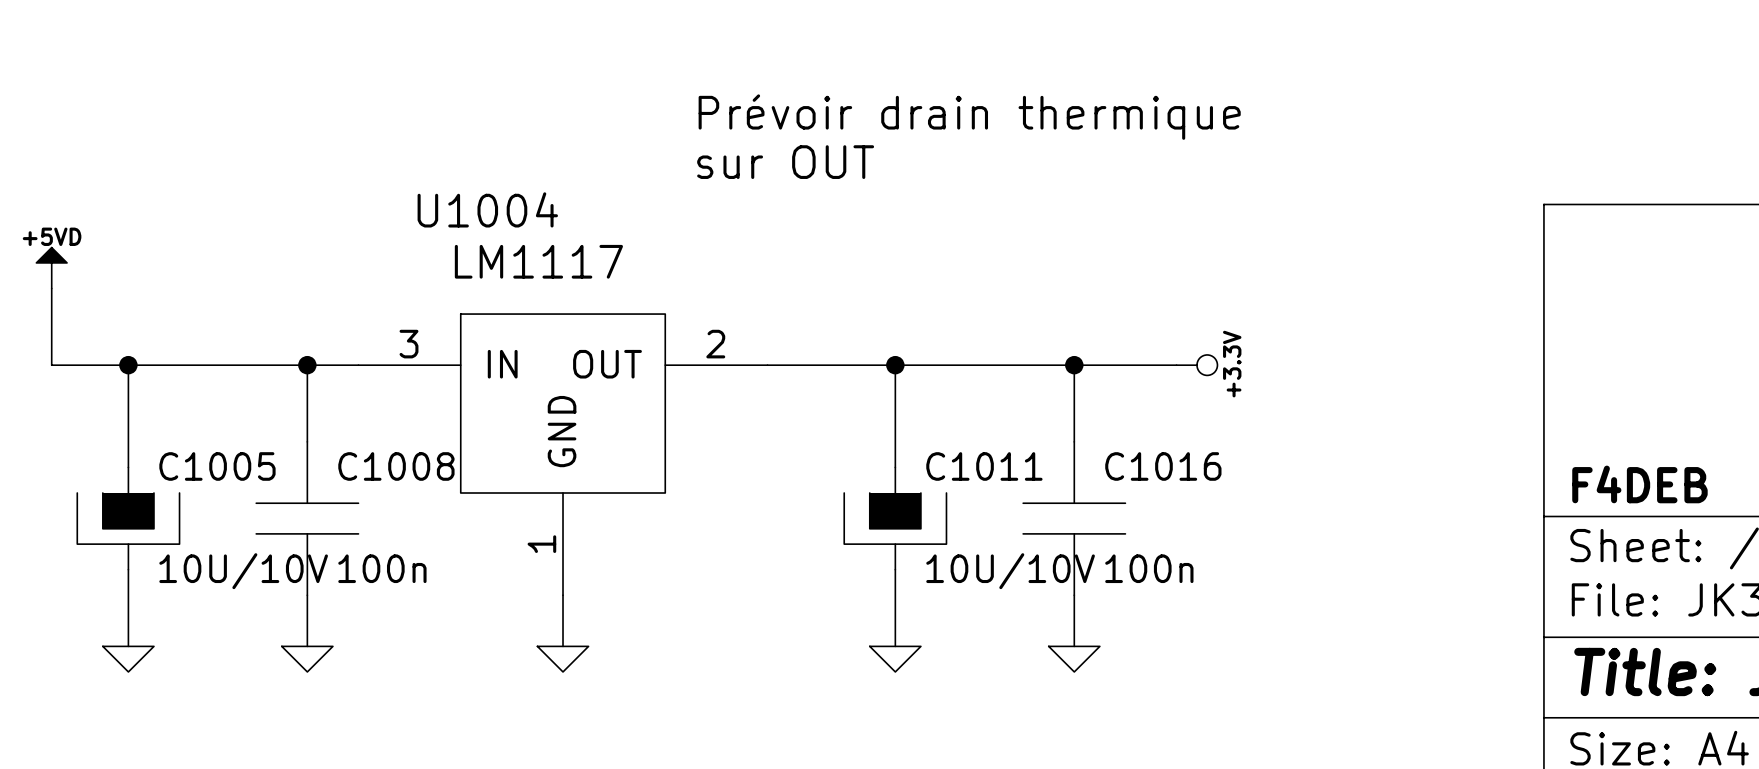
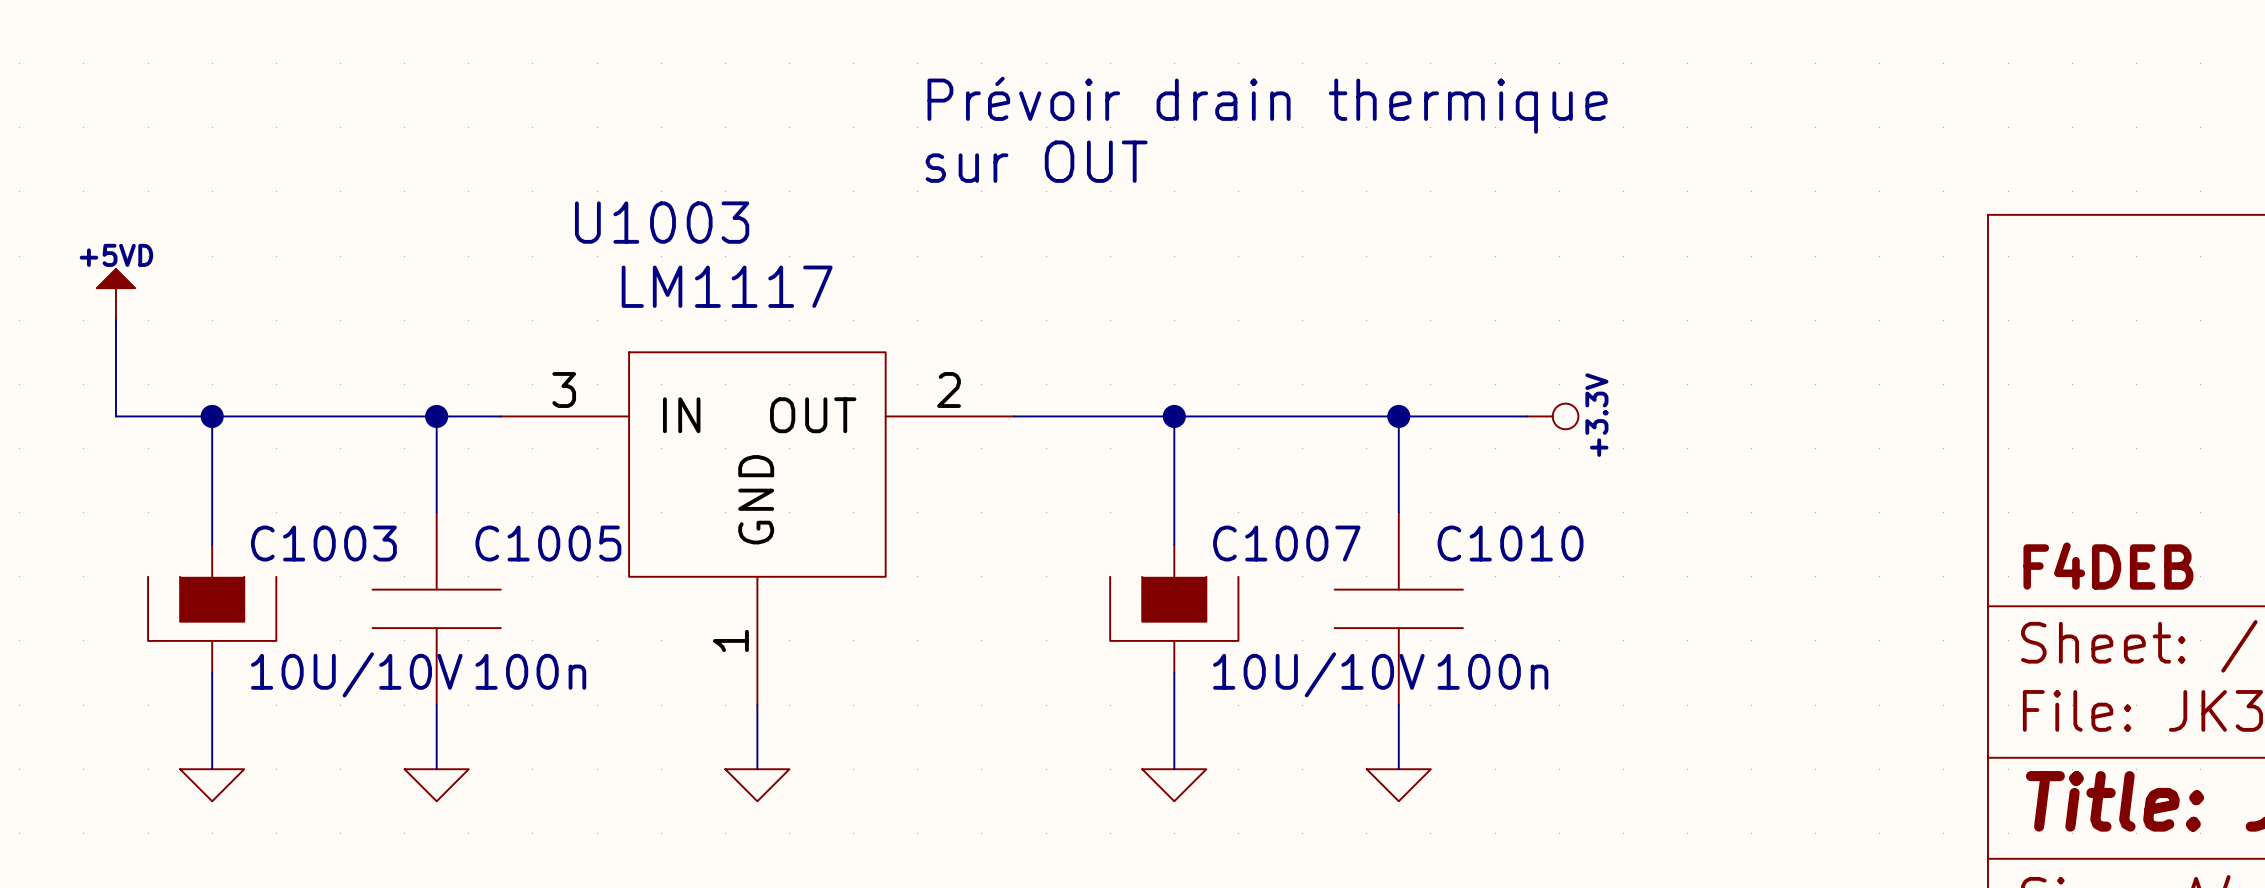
U1004 name: U1004 (487, 209) -> U1003 (662, 222)
C1005 name: C1005 (217, 466) -> C1003 (323, 543)
C1008 name: C1008 (396, 466) -> C1005 (548, 543)
C1011 name: C1011 (984, 466) -> C1007 (1286, 543)
C1016 name: C1016 (1163, 466) -> C1010 (1510, 543)

